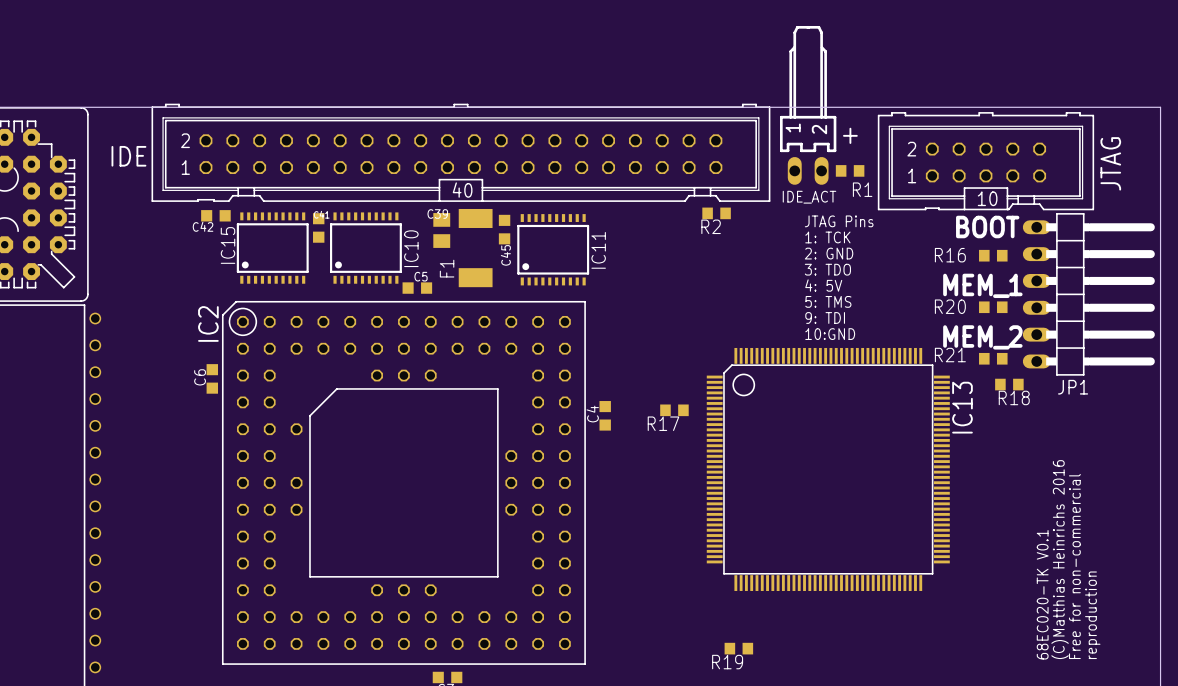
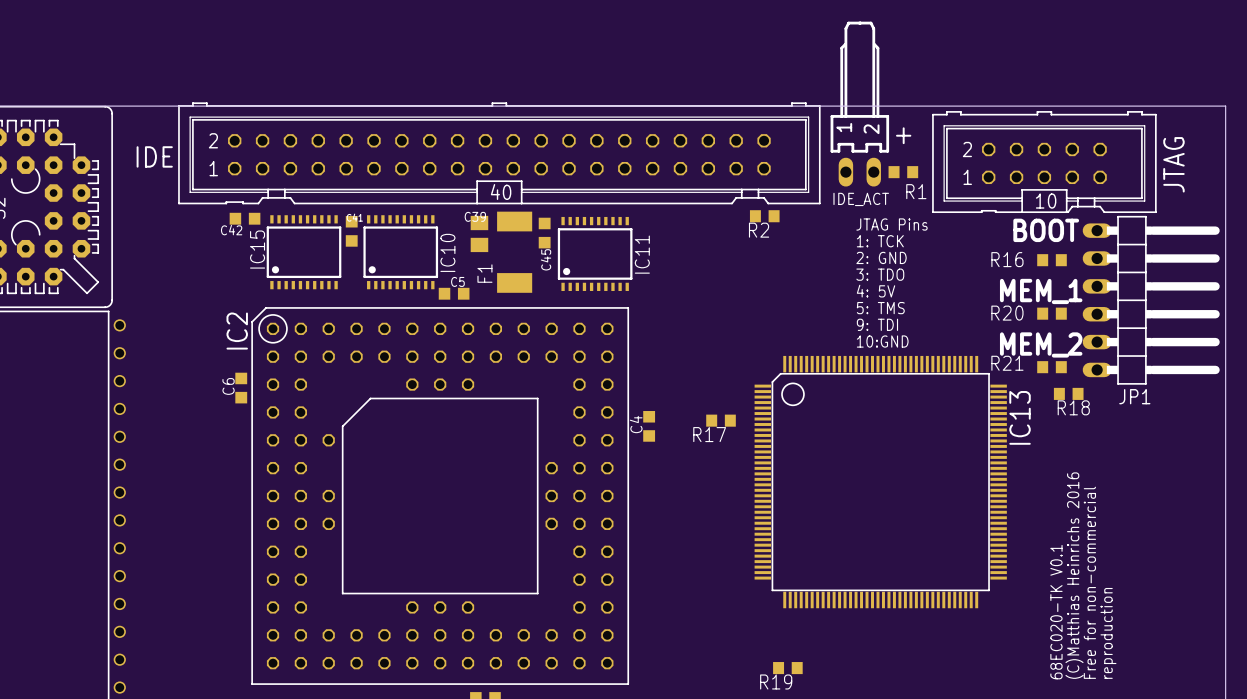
text position: (C)Matthias Heinrichs 2016 (1060, 559) -> (C)Matthias Heinrichs 2016 (1074, 575)
text position: Free for non-commercial (1074, 566) -> Free for non-commercial (1089, 582)
text: none -> 68EC020-TK V0.1 (1056, 612)
text: 68EC020-TK V0.1 (1042, 594) -> reproduction (1108, 633)
text: reproduction (1092, 615) -> none

